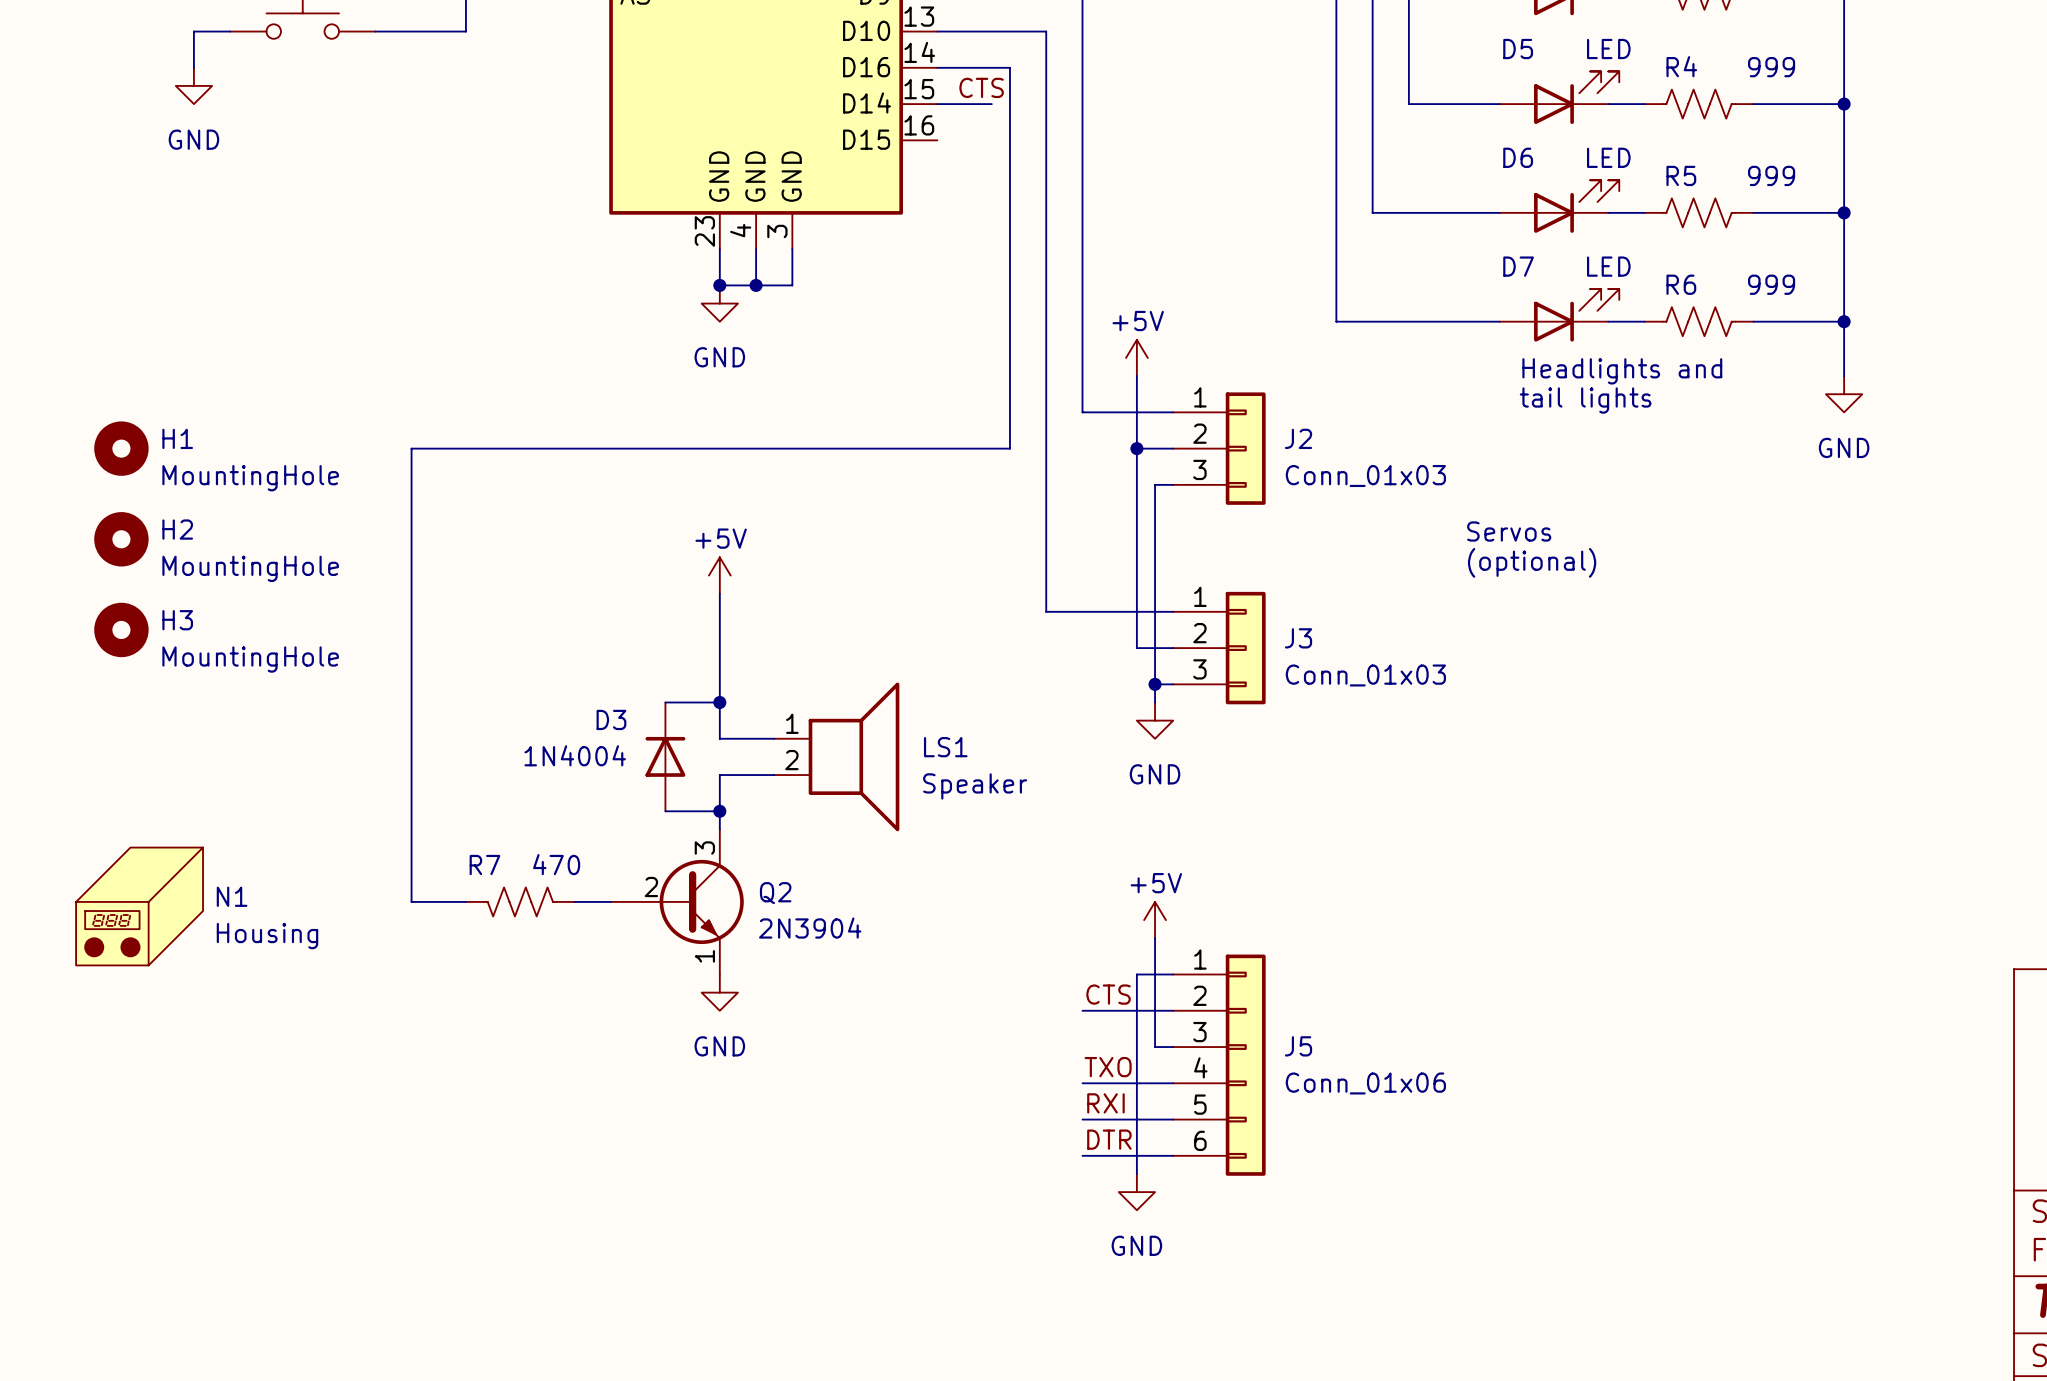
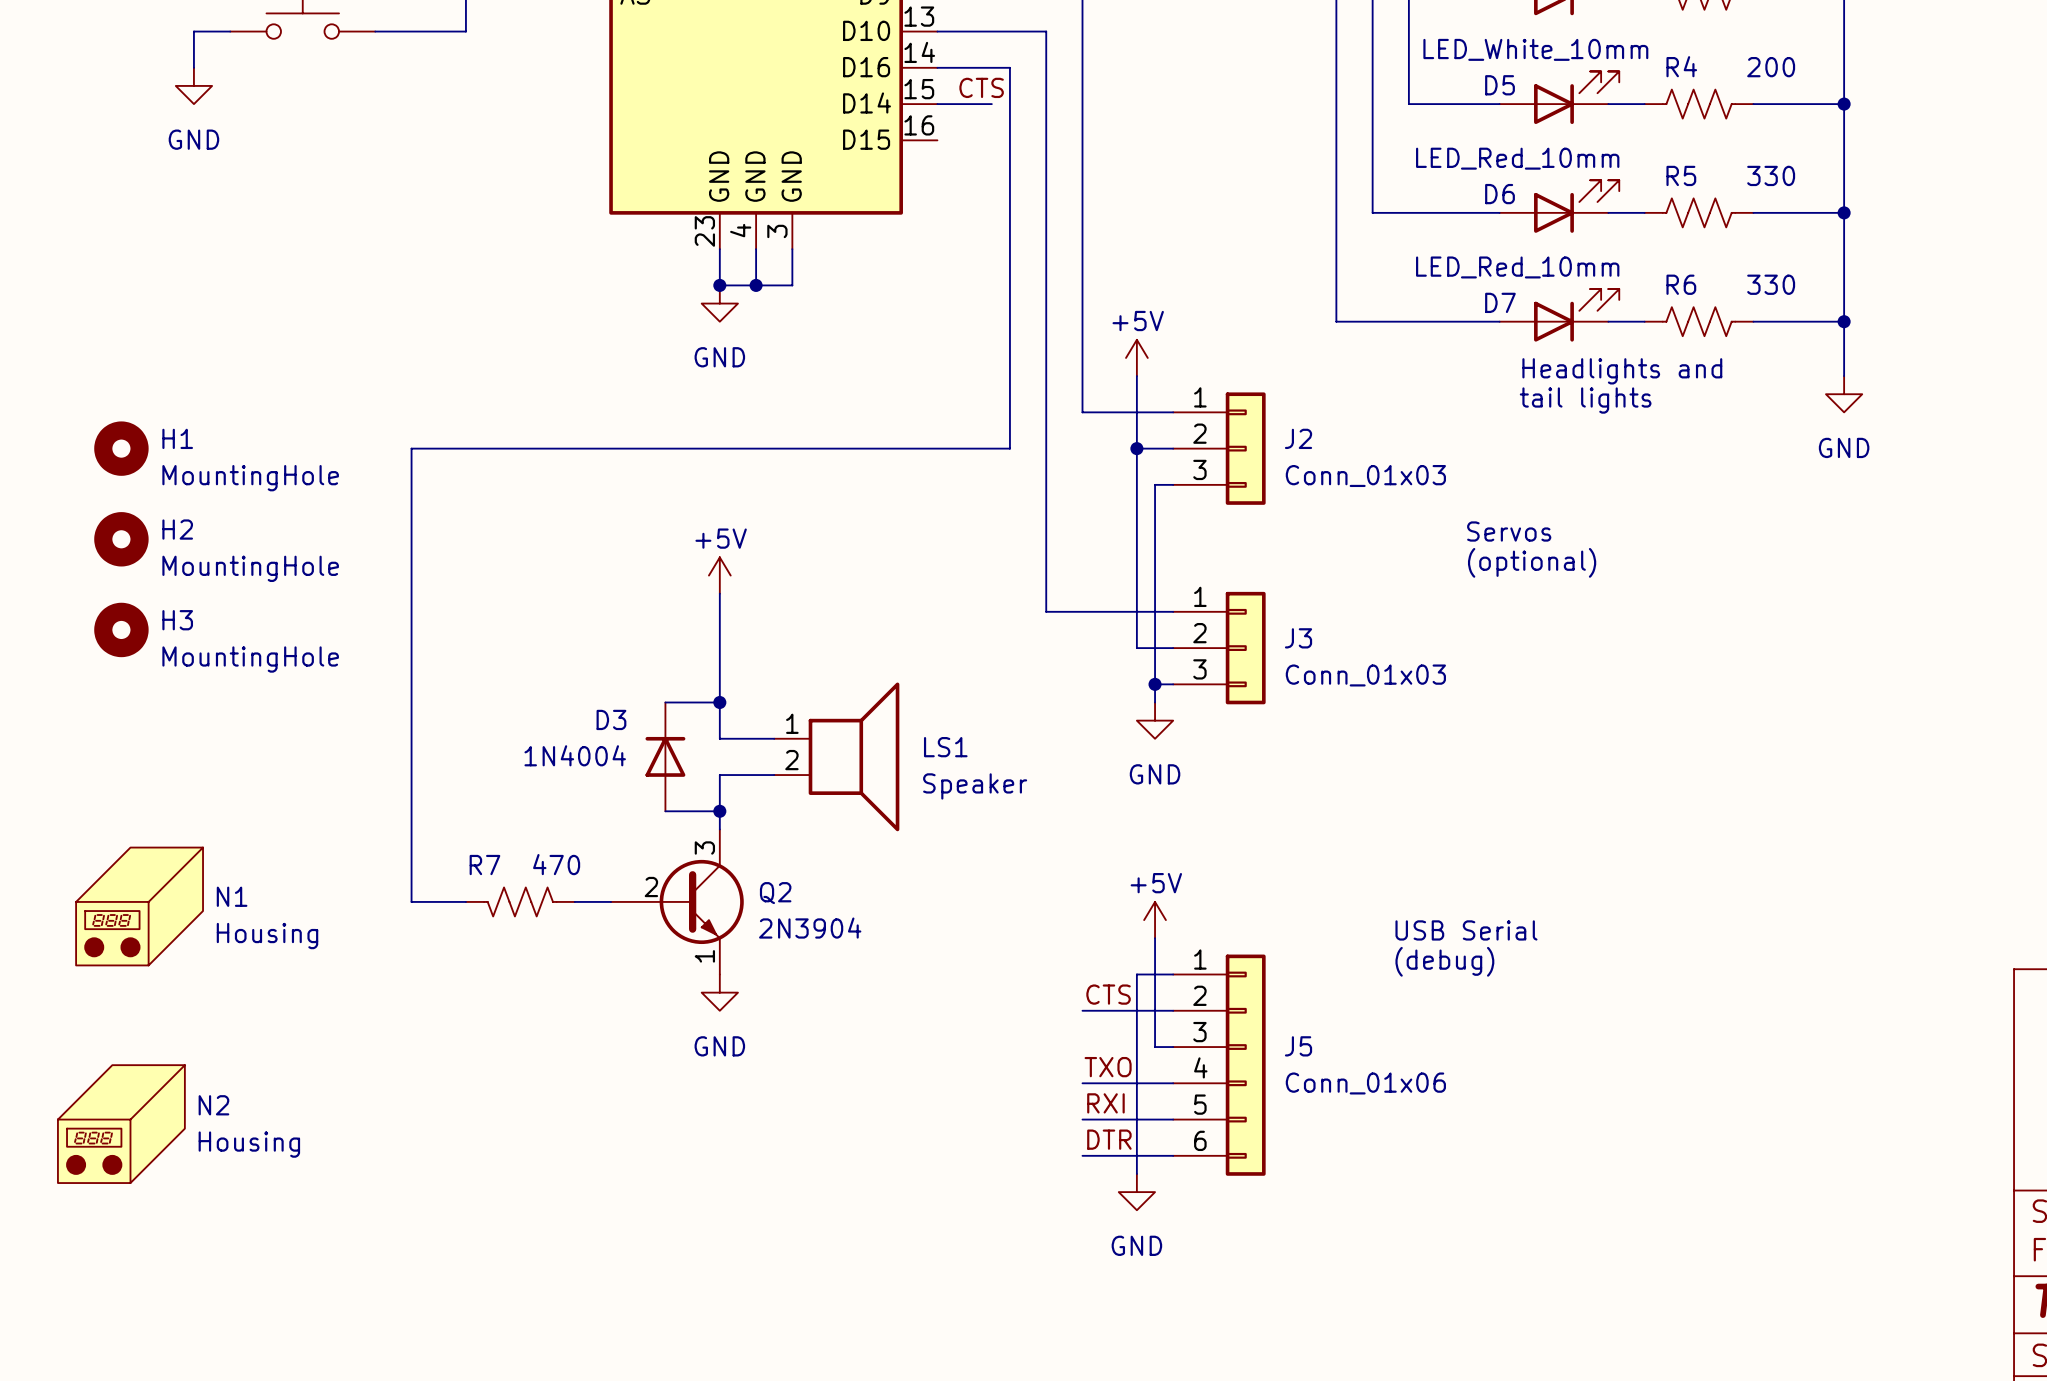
D5 name position: D5 (1518, 49) -> D5 (1500, 85)
D5 value: LED (1608, 49) -> LED_White_10mm (1535, 49)
R4 value: 999 (1771, 67) -> 200 (1771, 67)
D6 name position: D6 (1518, 157) -> D6 (1500, 194)
D6 value: LED (1608, 157) -> LED_Red_10mm (1517, 158)
R5 value: 999 (1771, 175) -> 330 (1771, 175)
D7 name position: D7 (1518, 266) -> D7 (1500, 302)
D7 value: LED (1608, 266) -> LED_Red_10mm (1517, 267)
R6 value: 999 (1771, 284) -> 330 (1771, 284)
text: none -> USB Serial (1466, 930)
text: none -> (debug) (1444, 961)
N2: none -> Housing (121, 1124)

